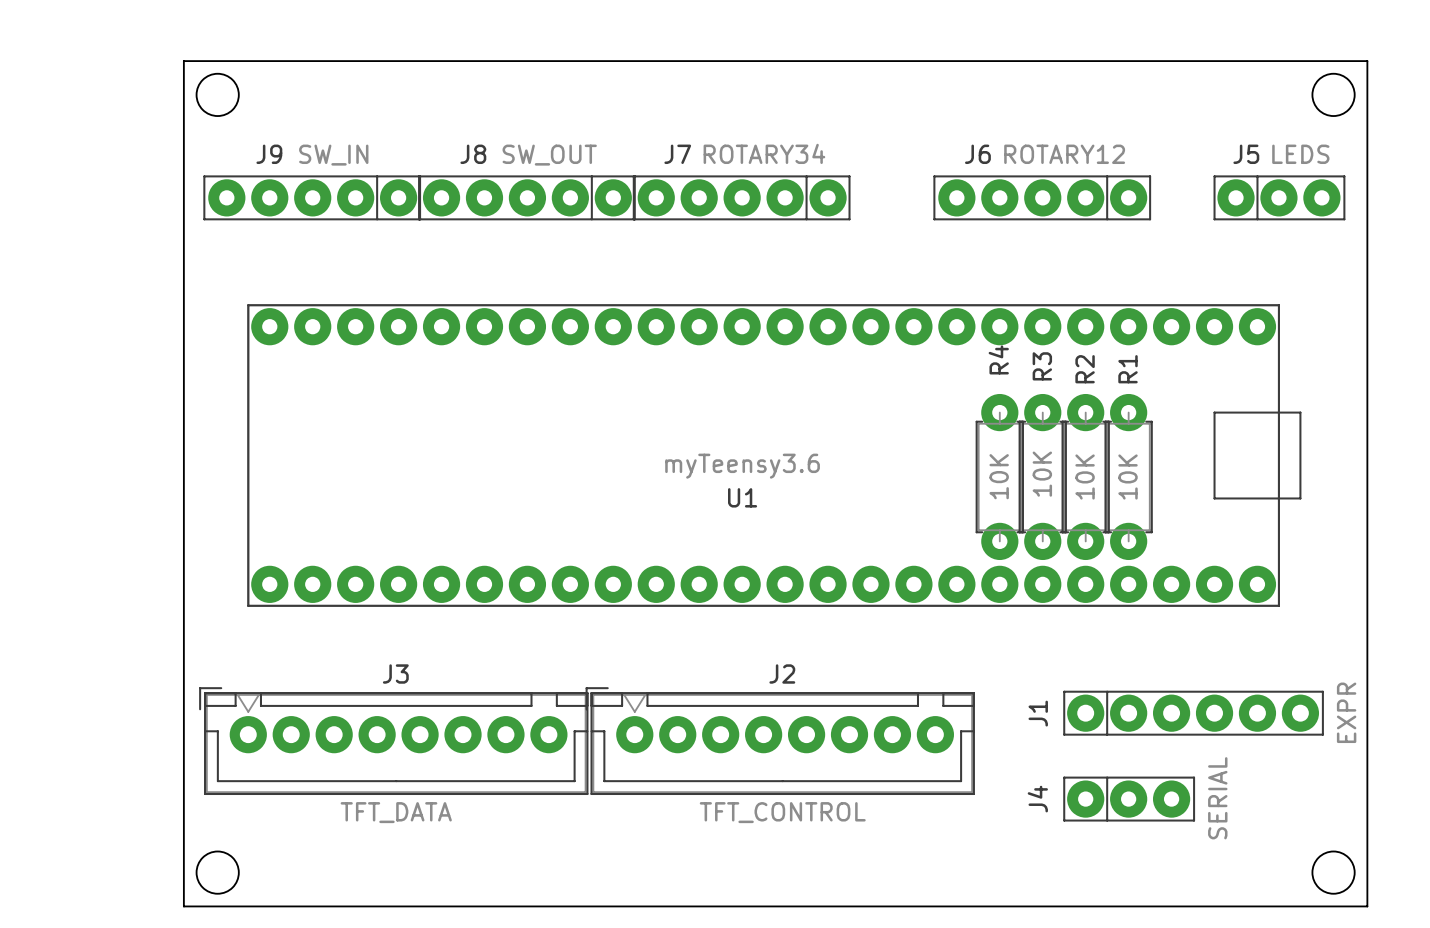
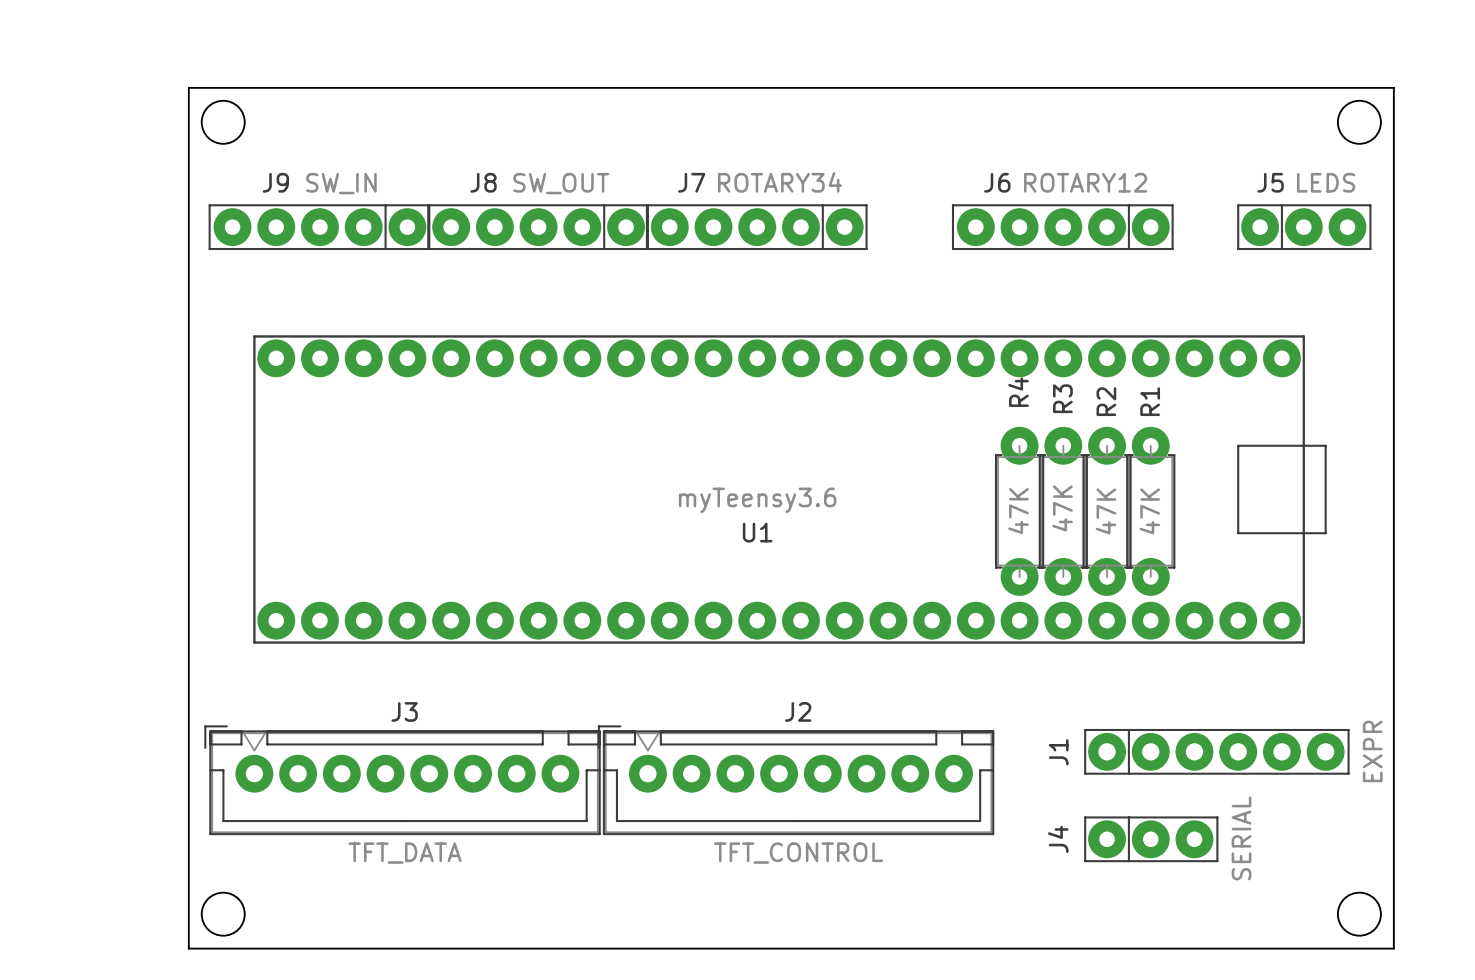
R3 value: 10K (1042, 474) -> 47K (1062, 508)
R4 value: 10K (999, 476) -> 47K (1018, 511)
R2 value: 10K (1085, 476) -> 47K (1105, 511)
R1 value: 10K (1128, 476) -> 47K (1149, 511)

